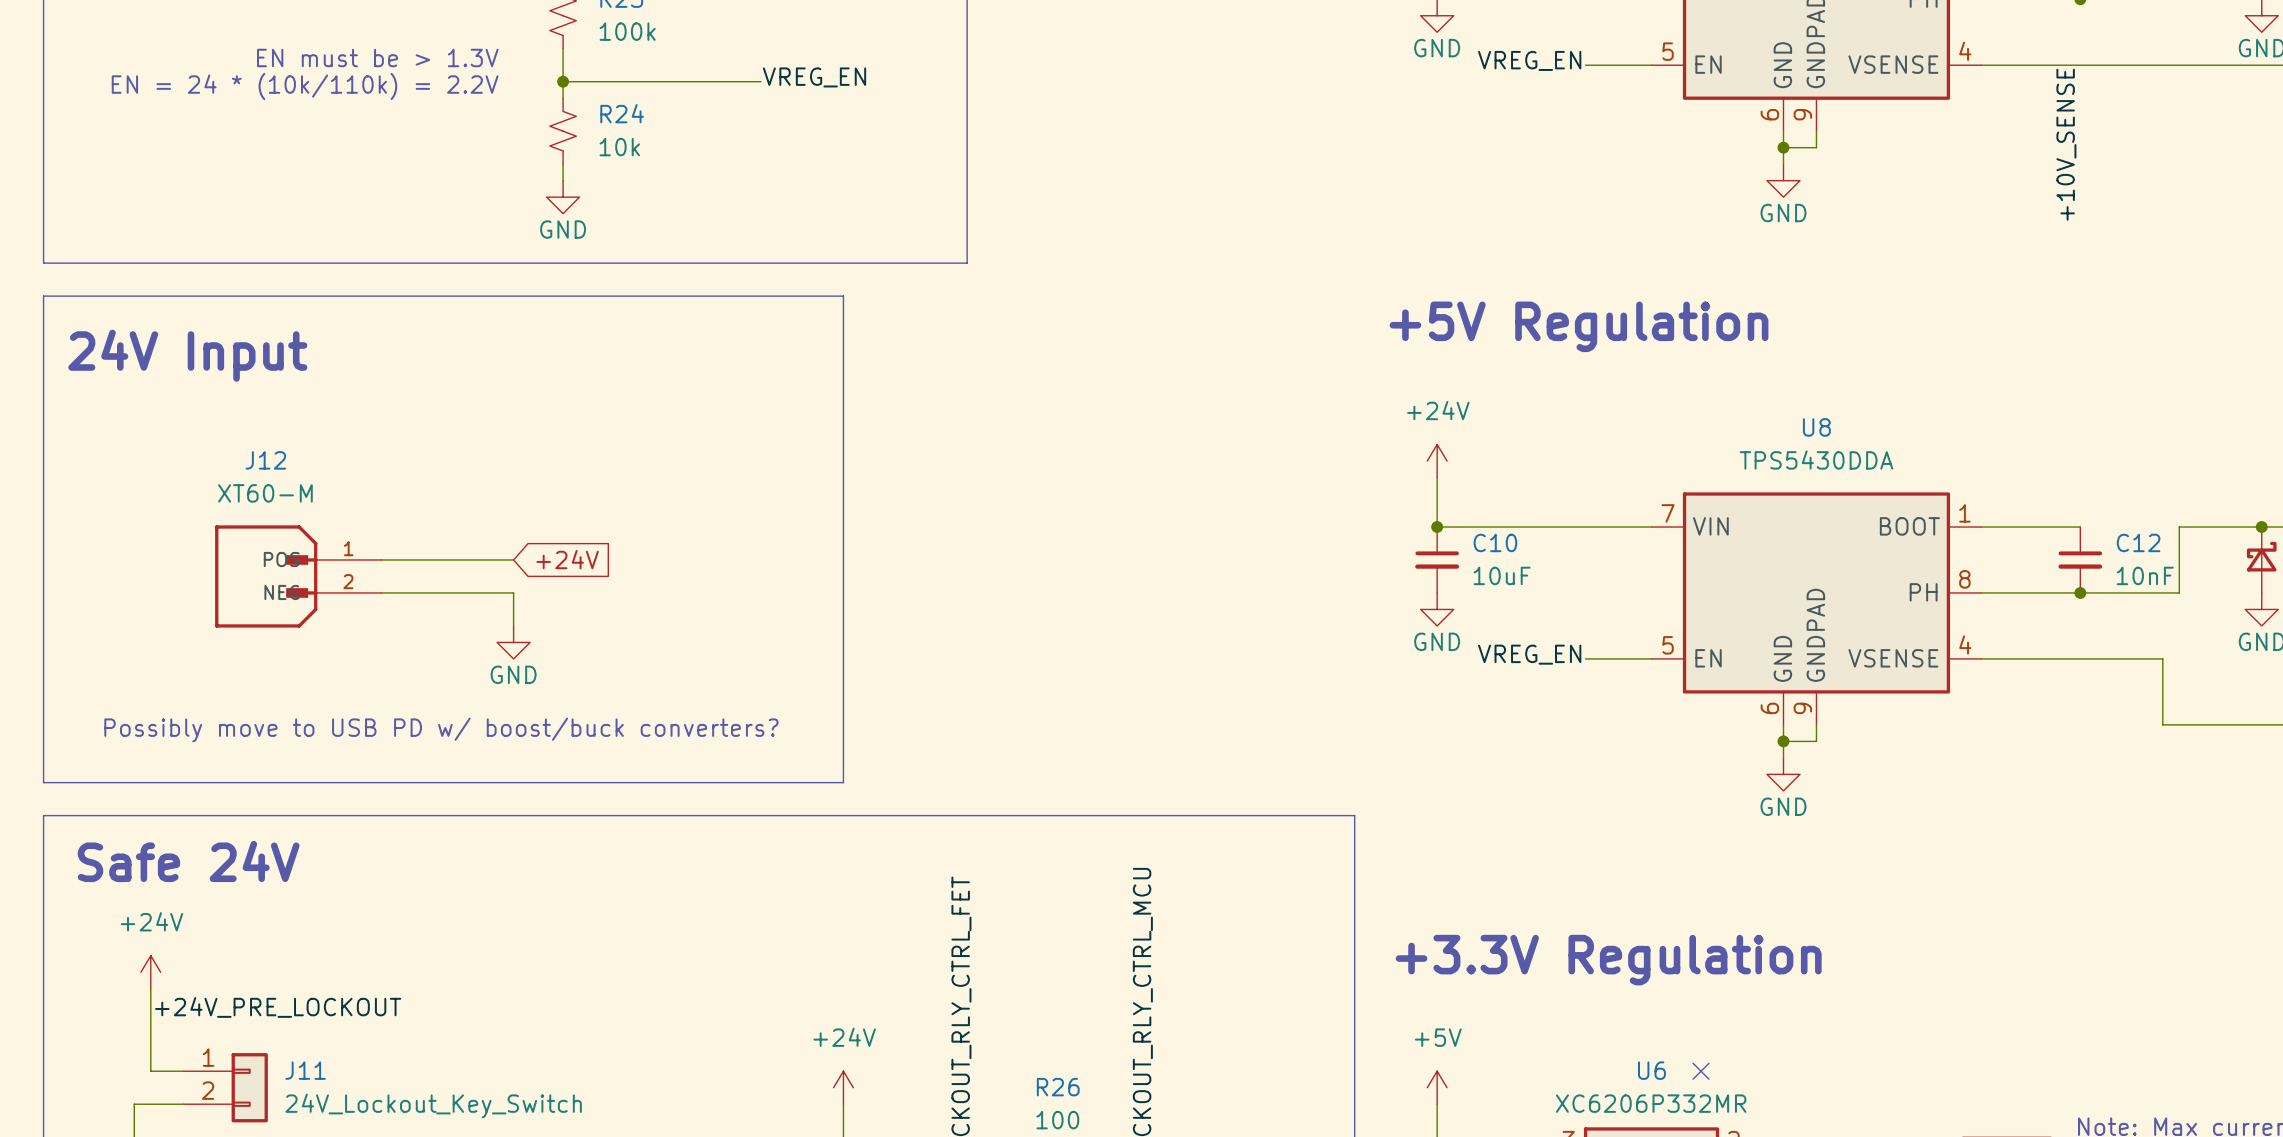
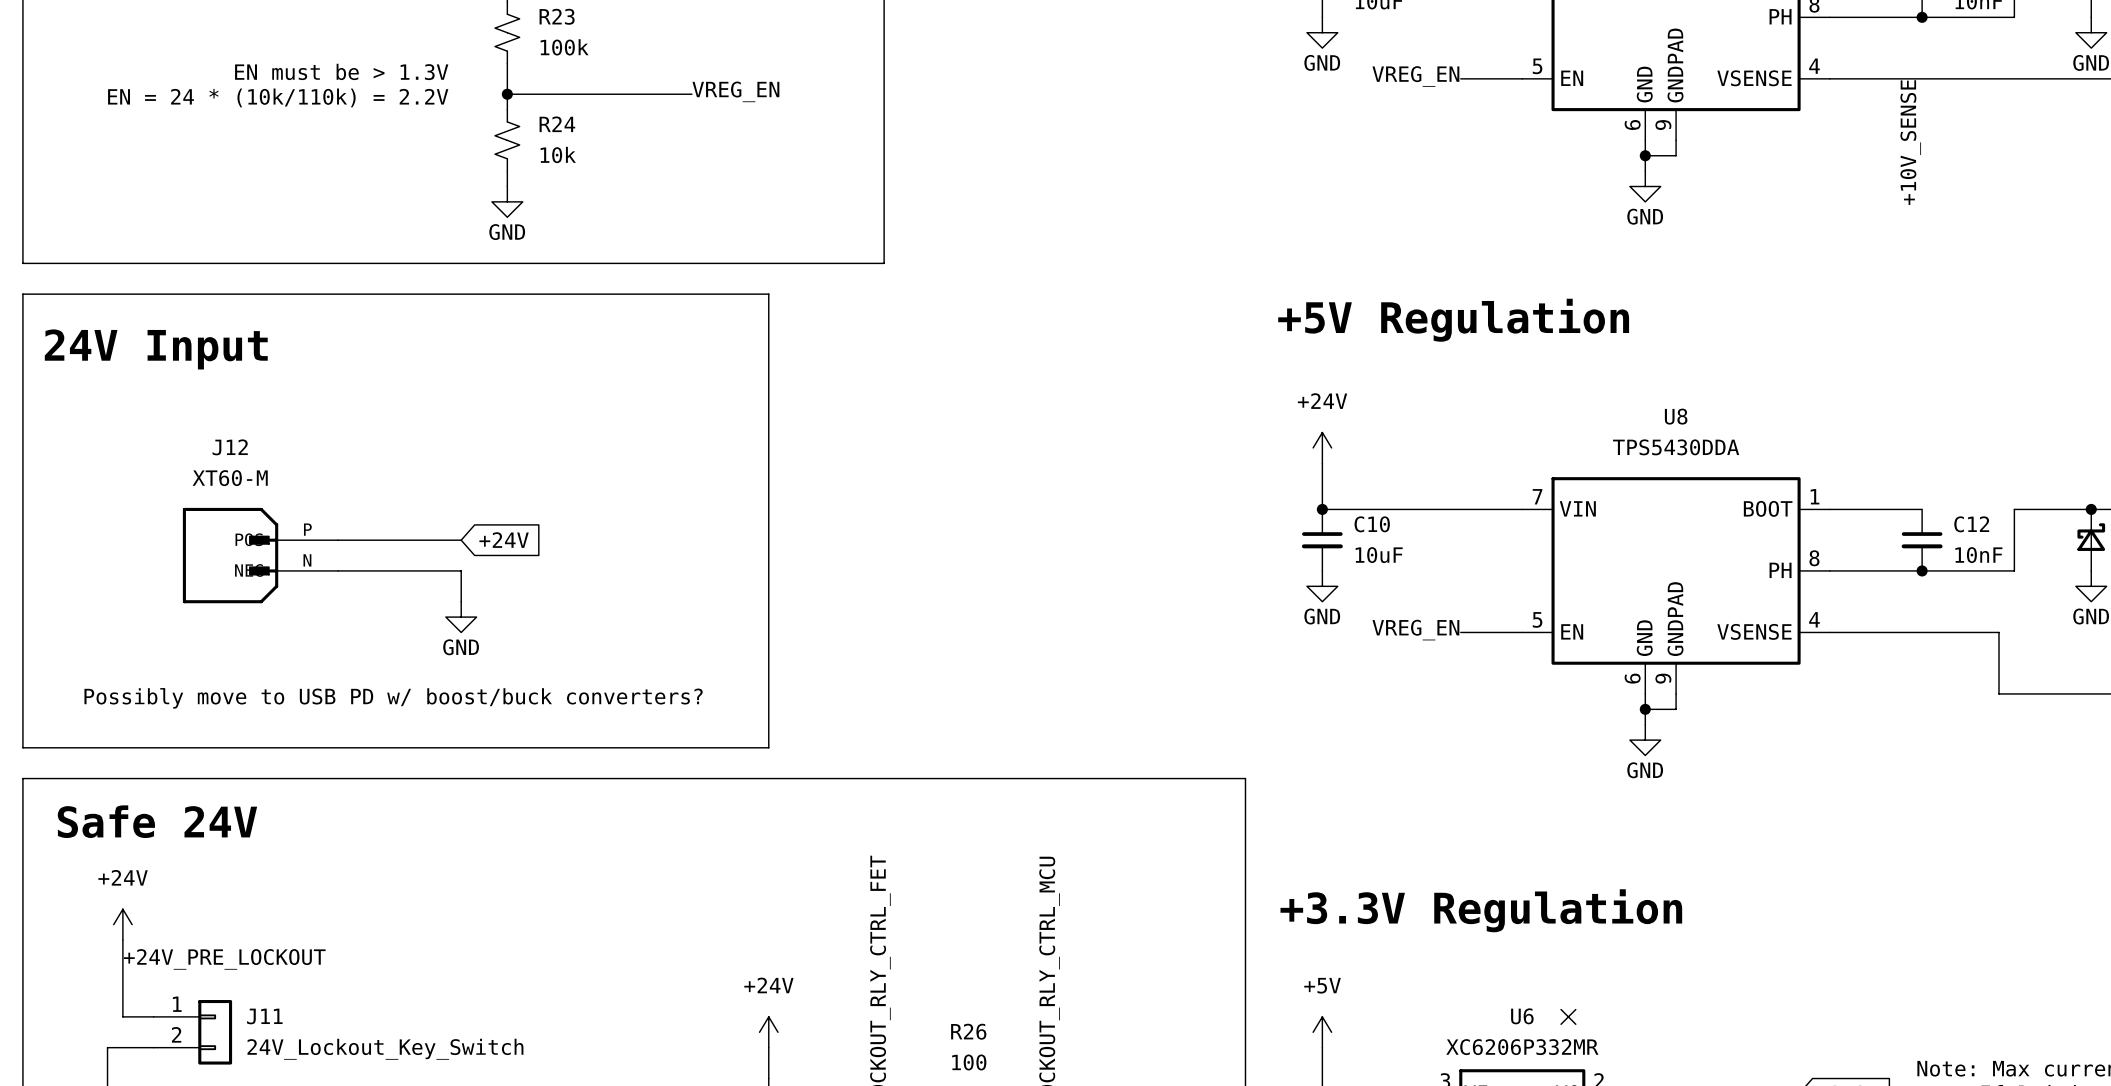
J12 pin number: 1 (348, 548) -> P (307, 529)
J12 pin number: 2 (348, 581) -> N (307, 560)

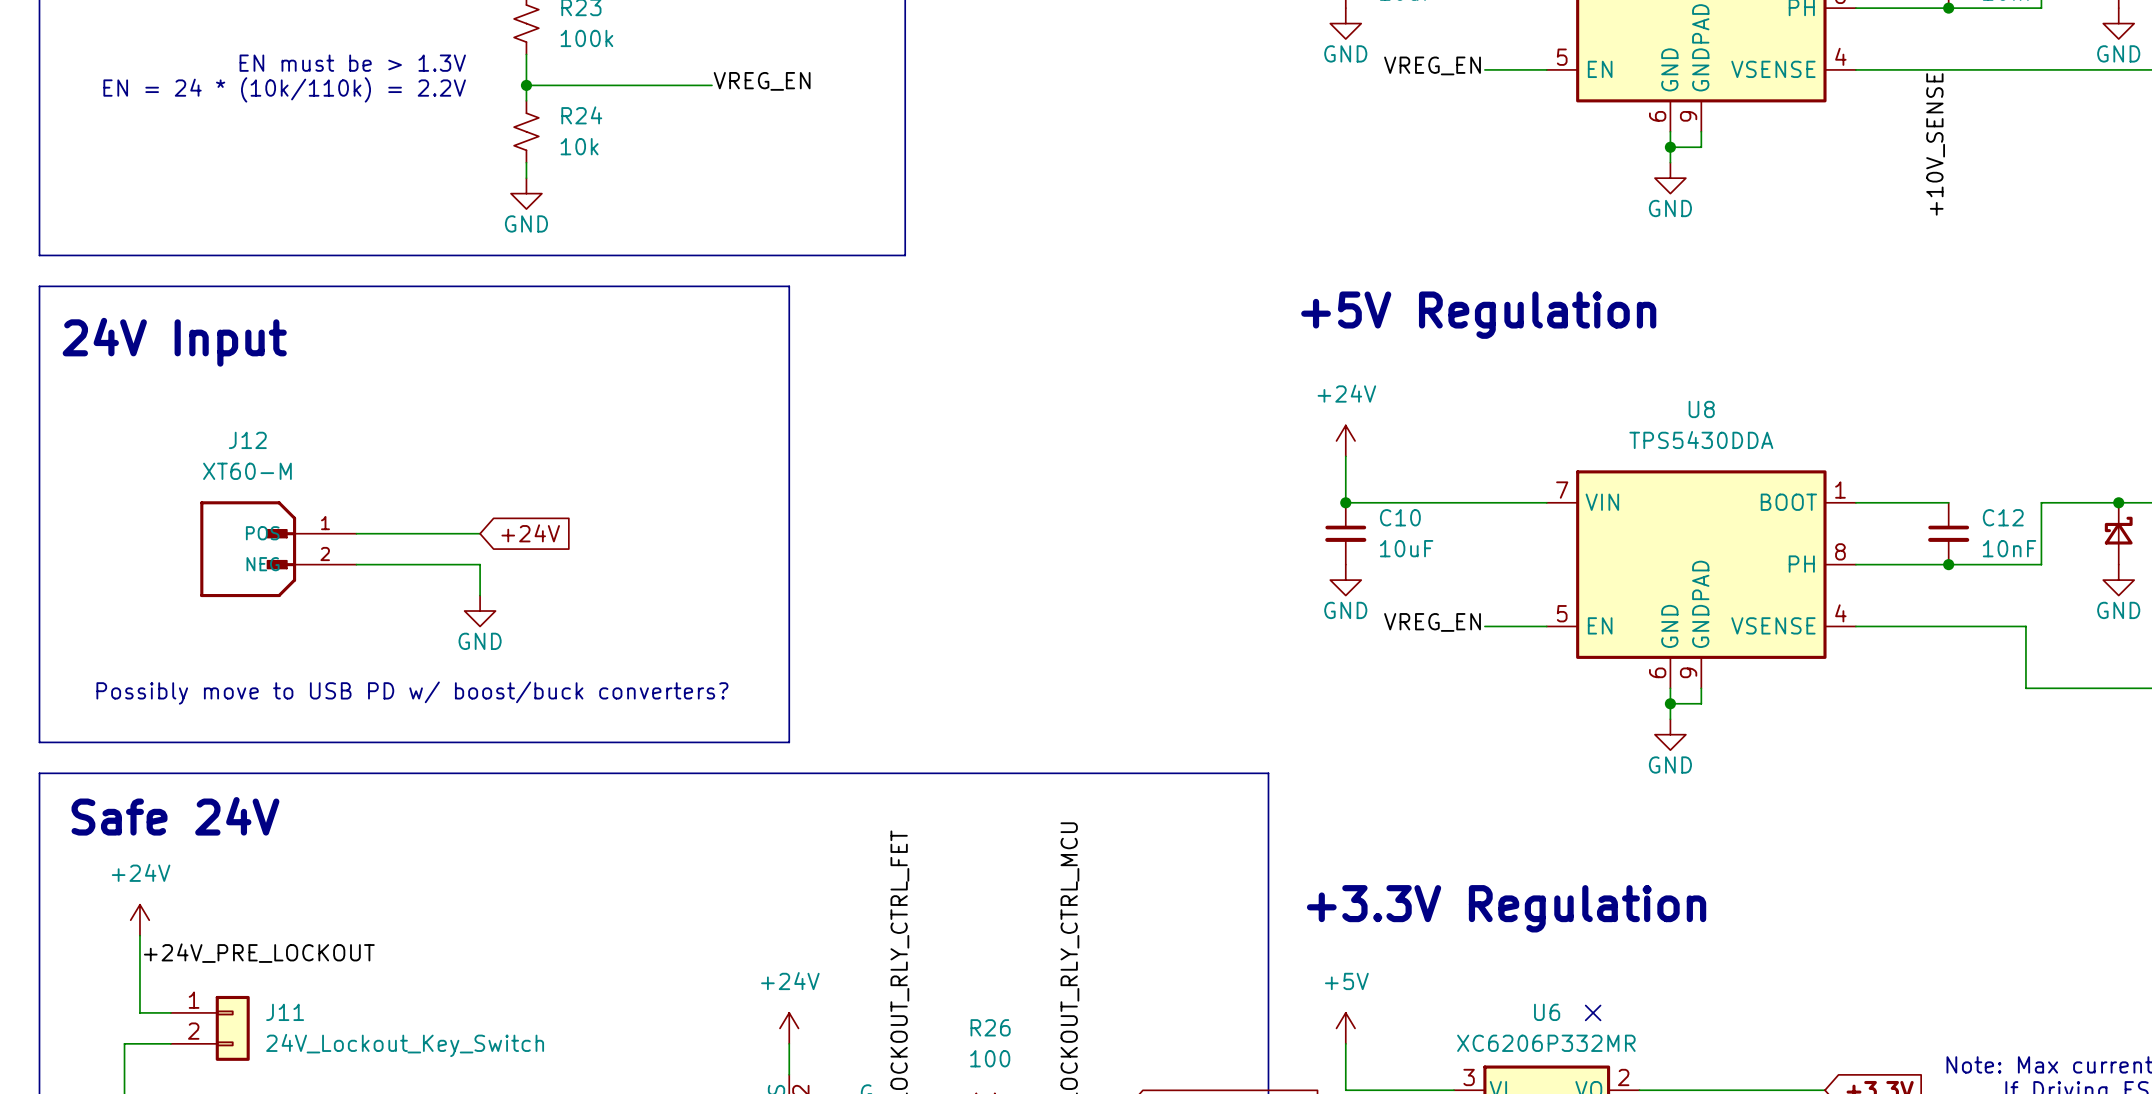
J12 pin number: P (307, 529) -> 1 (325, 523)
J12 pin number: N (307, 560) -> 2 (325, 554)

